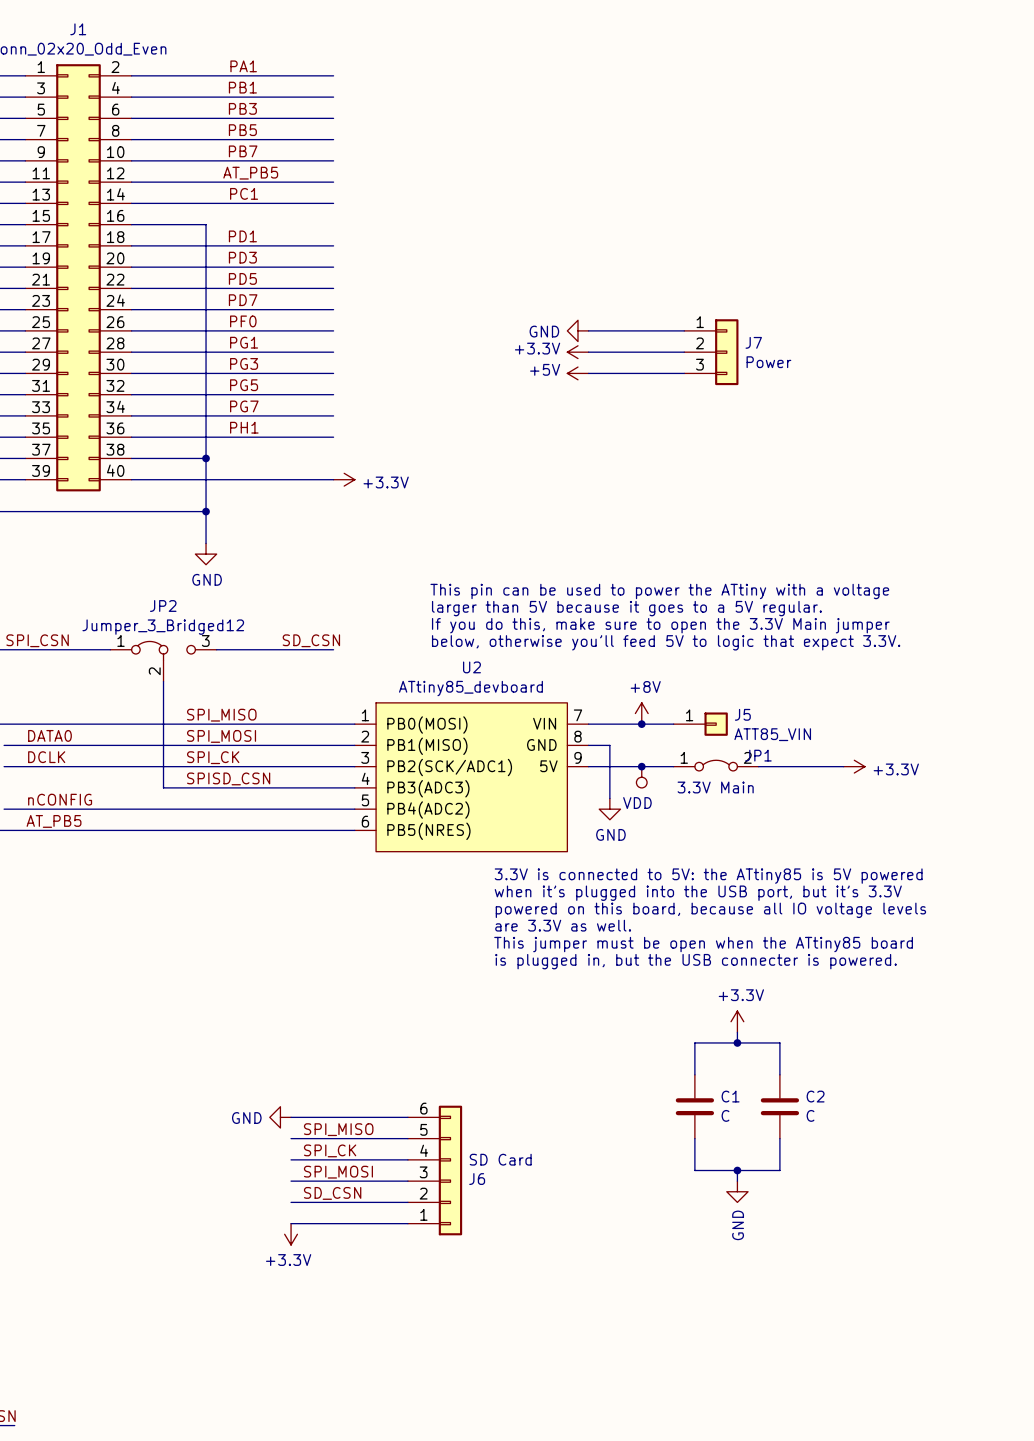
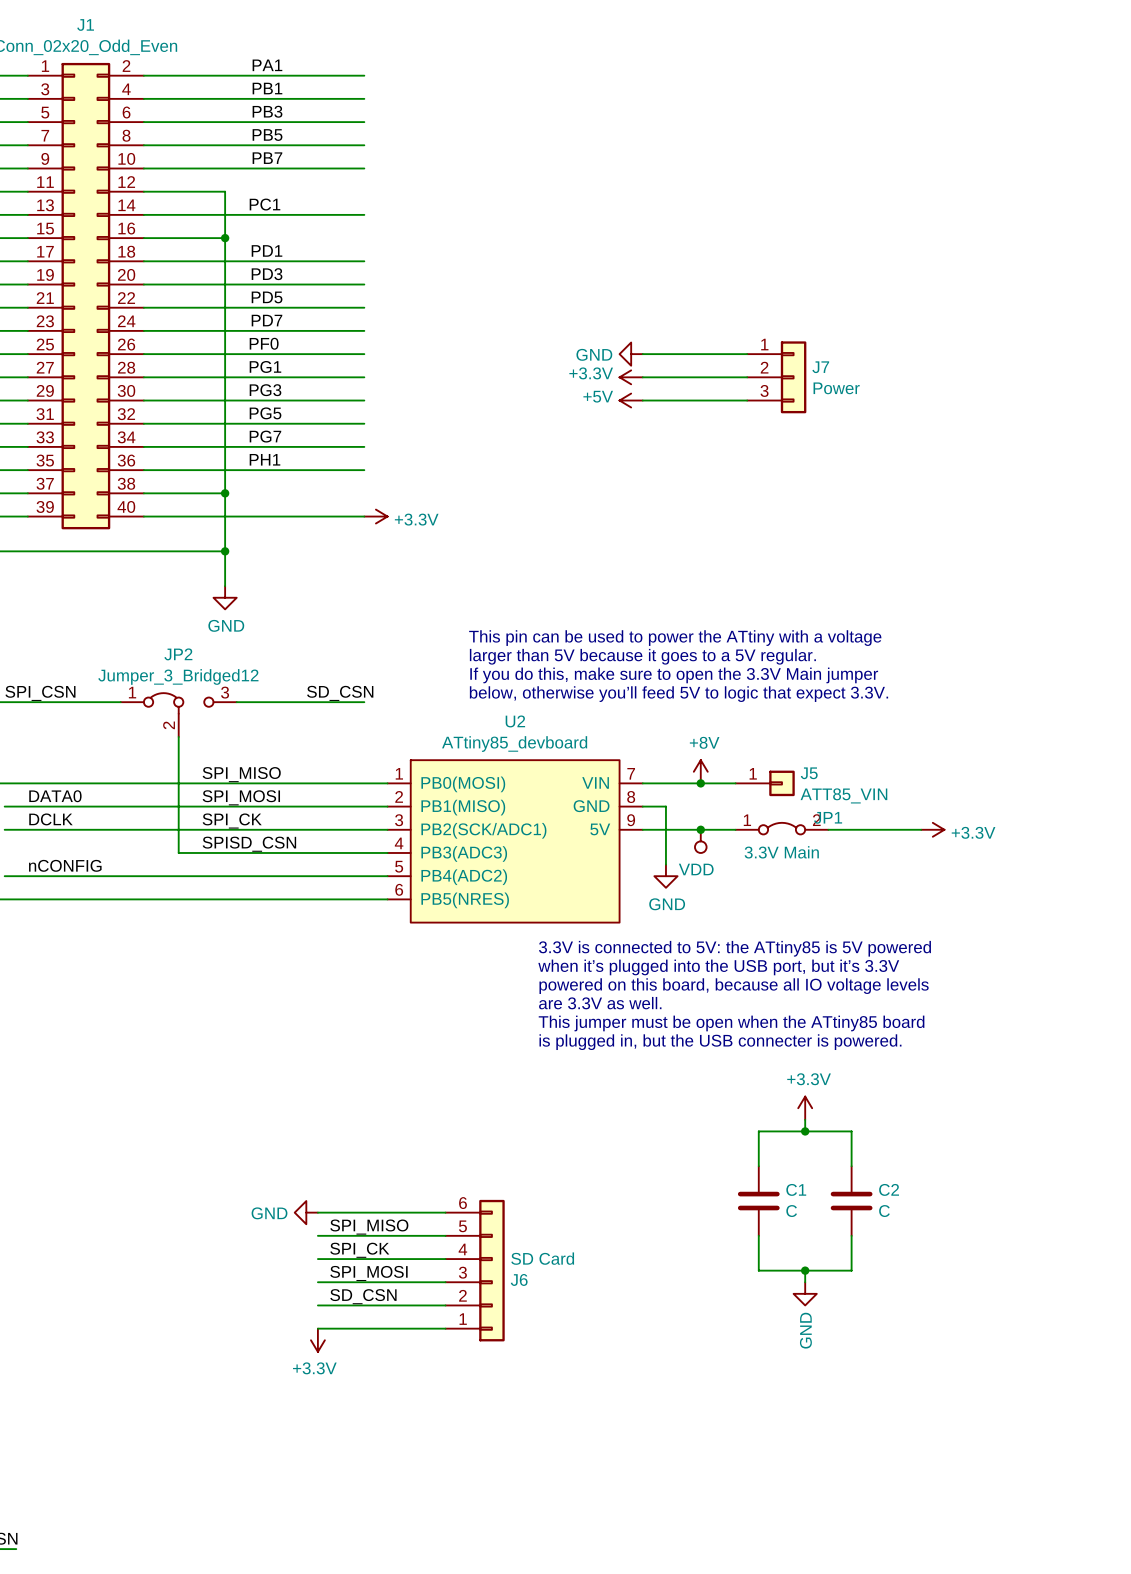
label: AT_PB5 (250, 173) -> none
wire: (206, 182) (333, 182) -> (225, 191) (225, 238)
junction: none -> (225, 238)
label: AT_PB5 (54, 821) -> none

